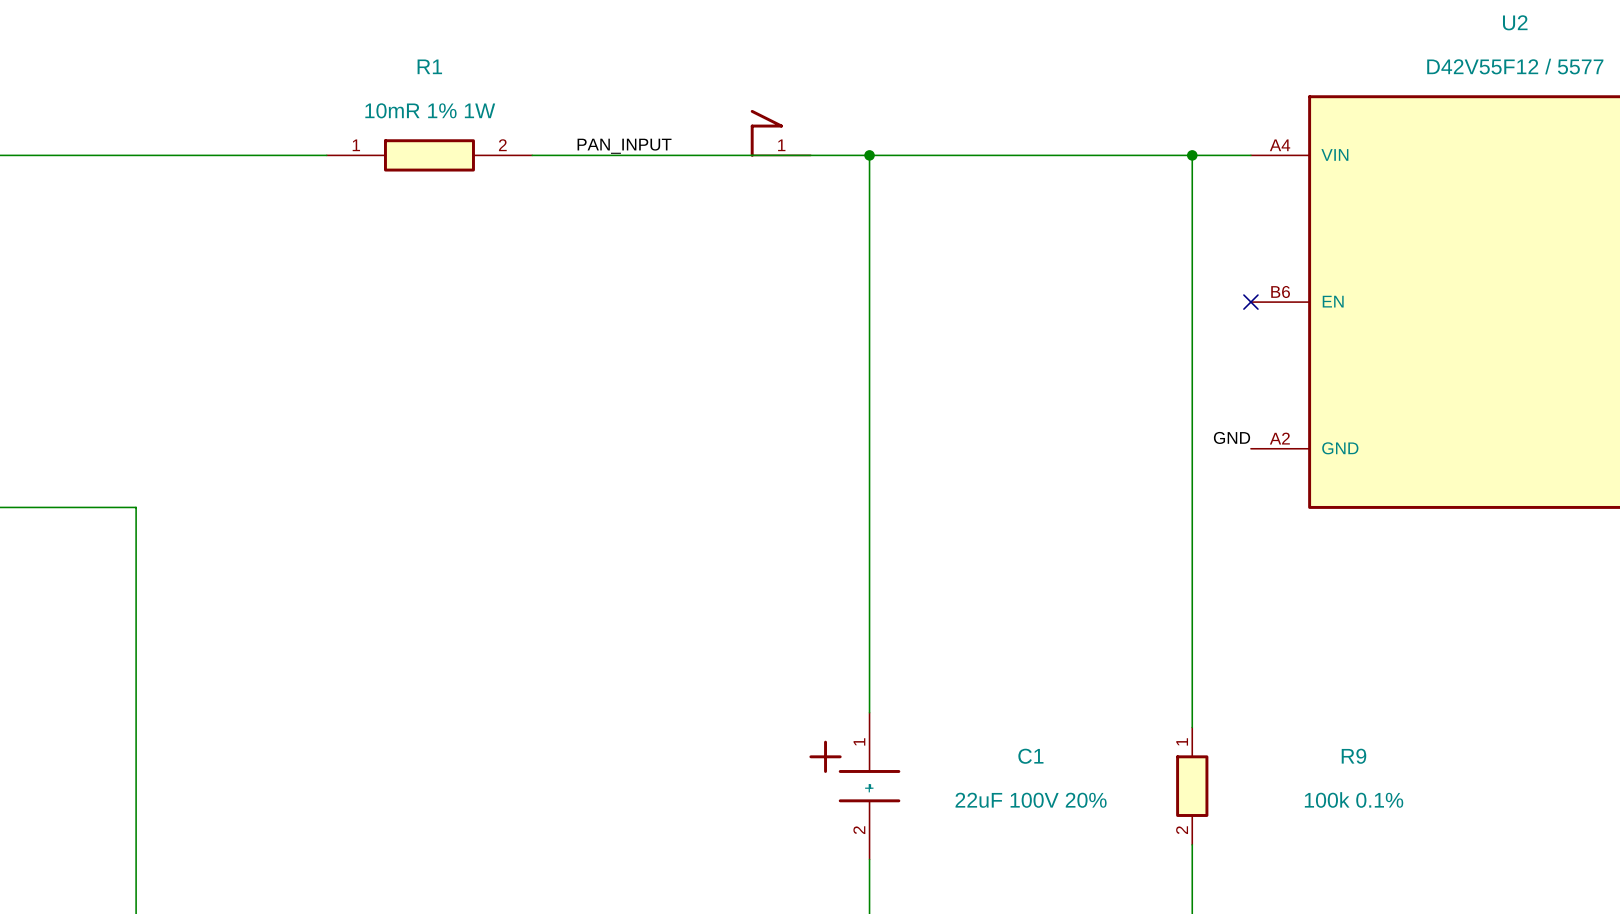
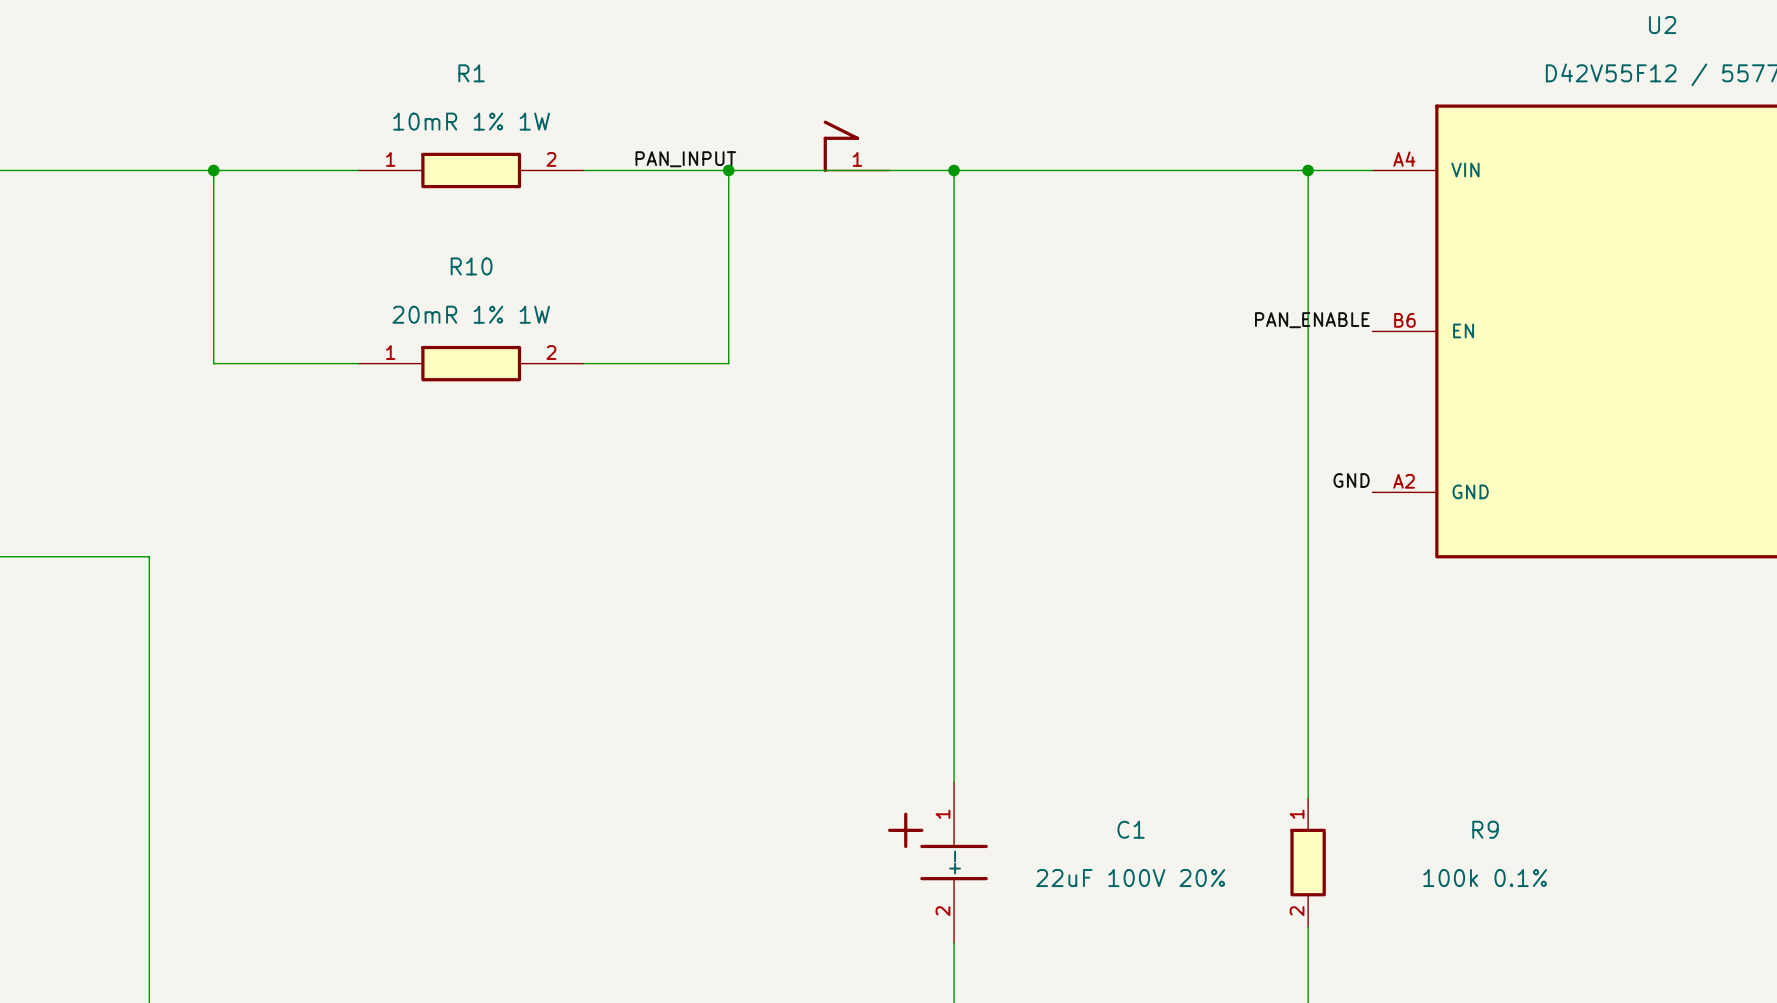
wire: none -> (213, 170) (213, 363) (358, 363)
junction: none -> (213, 170)
wire: none -> (728, 170) (728, 363) (583, 363)
junction: none -> (728, 170)
label: none -> PAN_ENABLE (1312, 320)
no-connect mark: (1250, 302) -> none
R10: none -> 20mR 1% 1W (471, 363)

